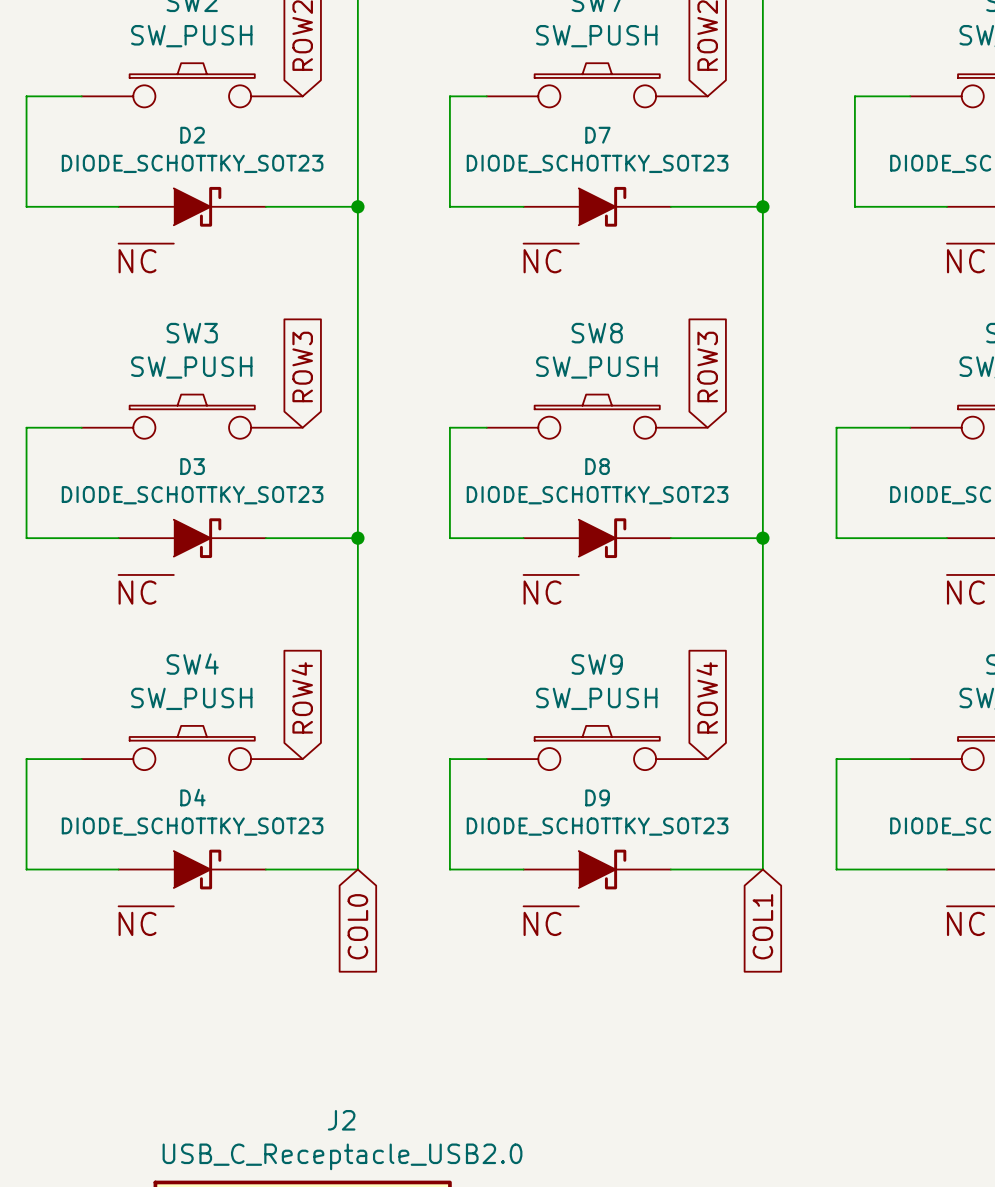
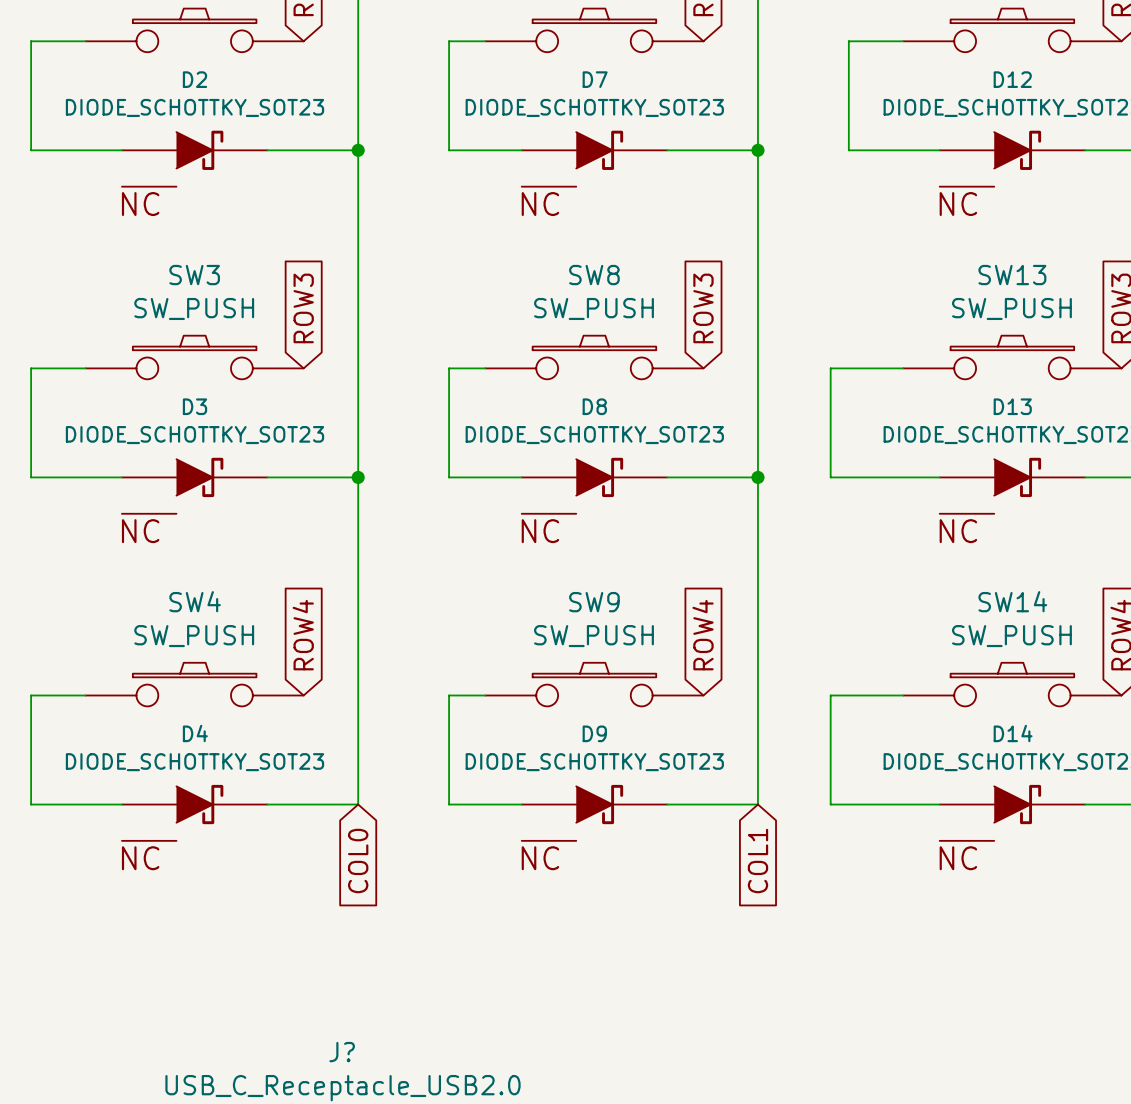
J2 name: J2 (341, 1120) -> J? (342, 1052)

